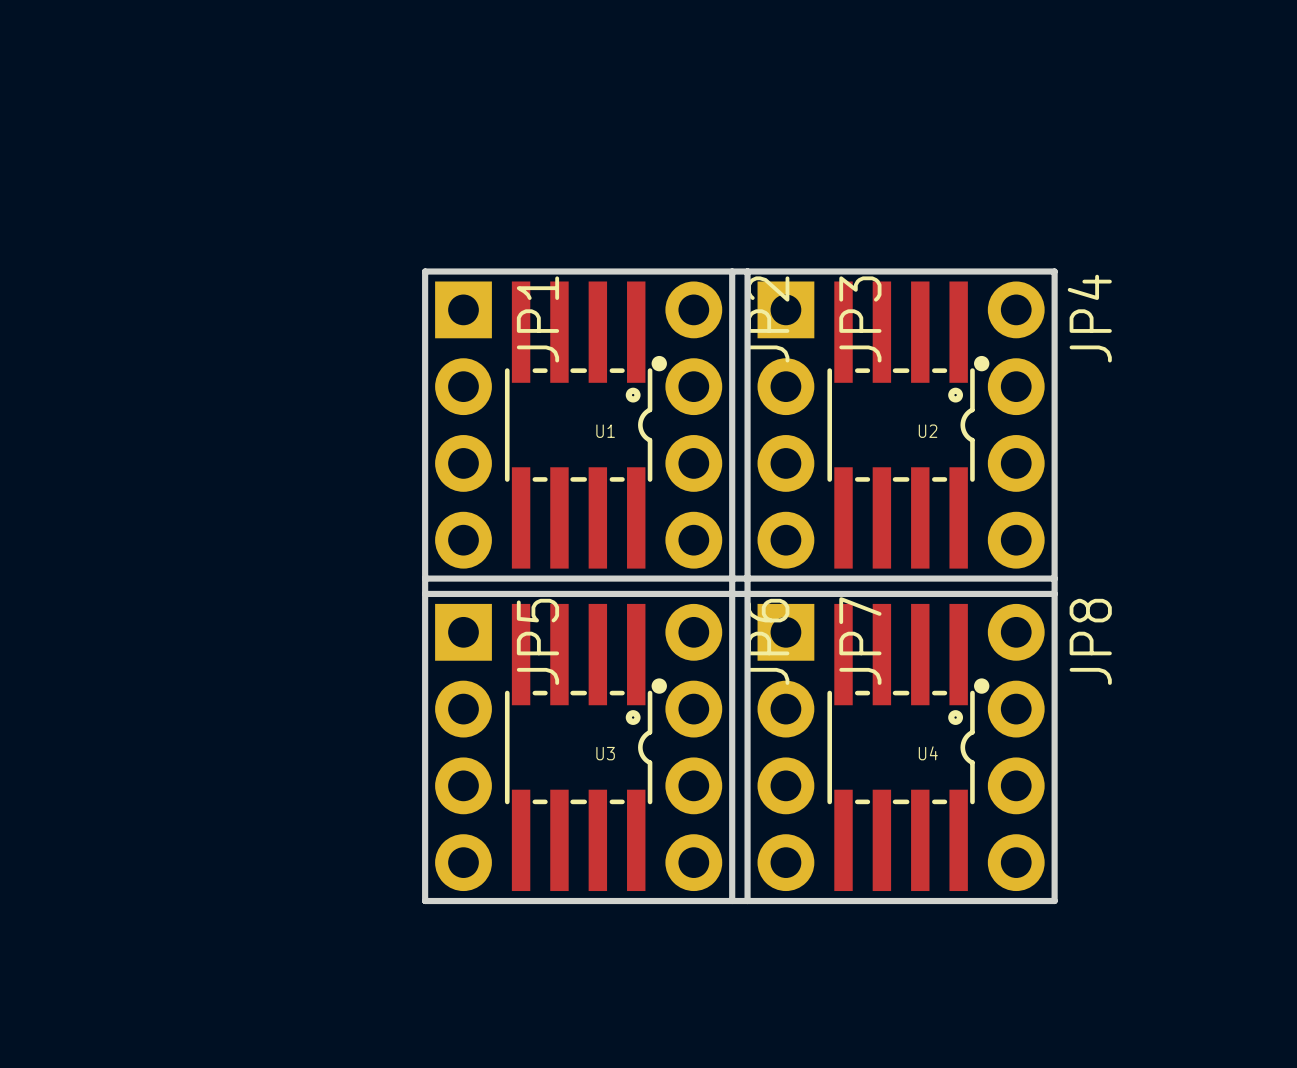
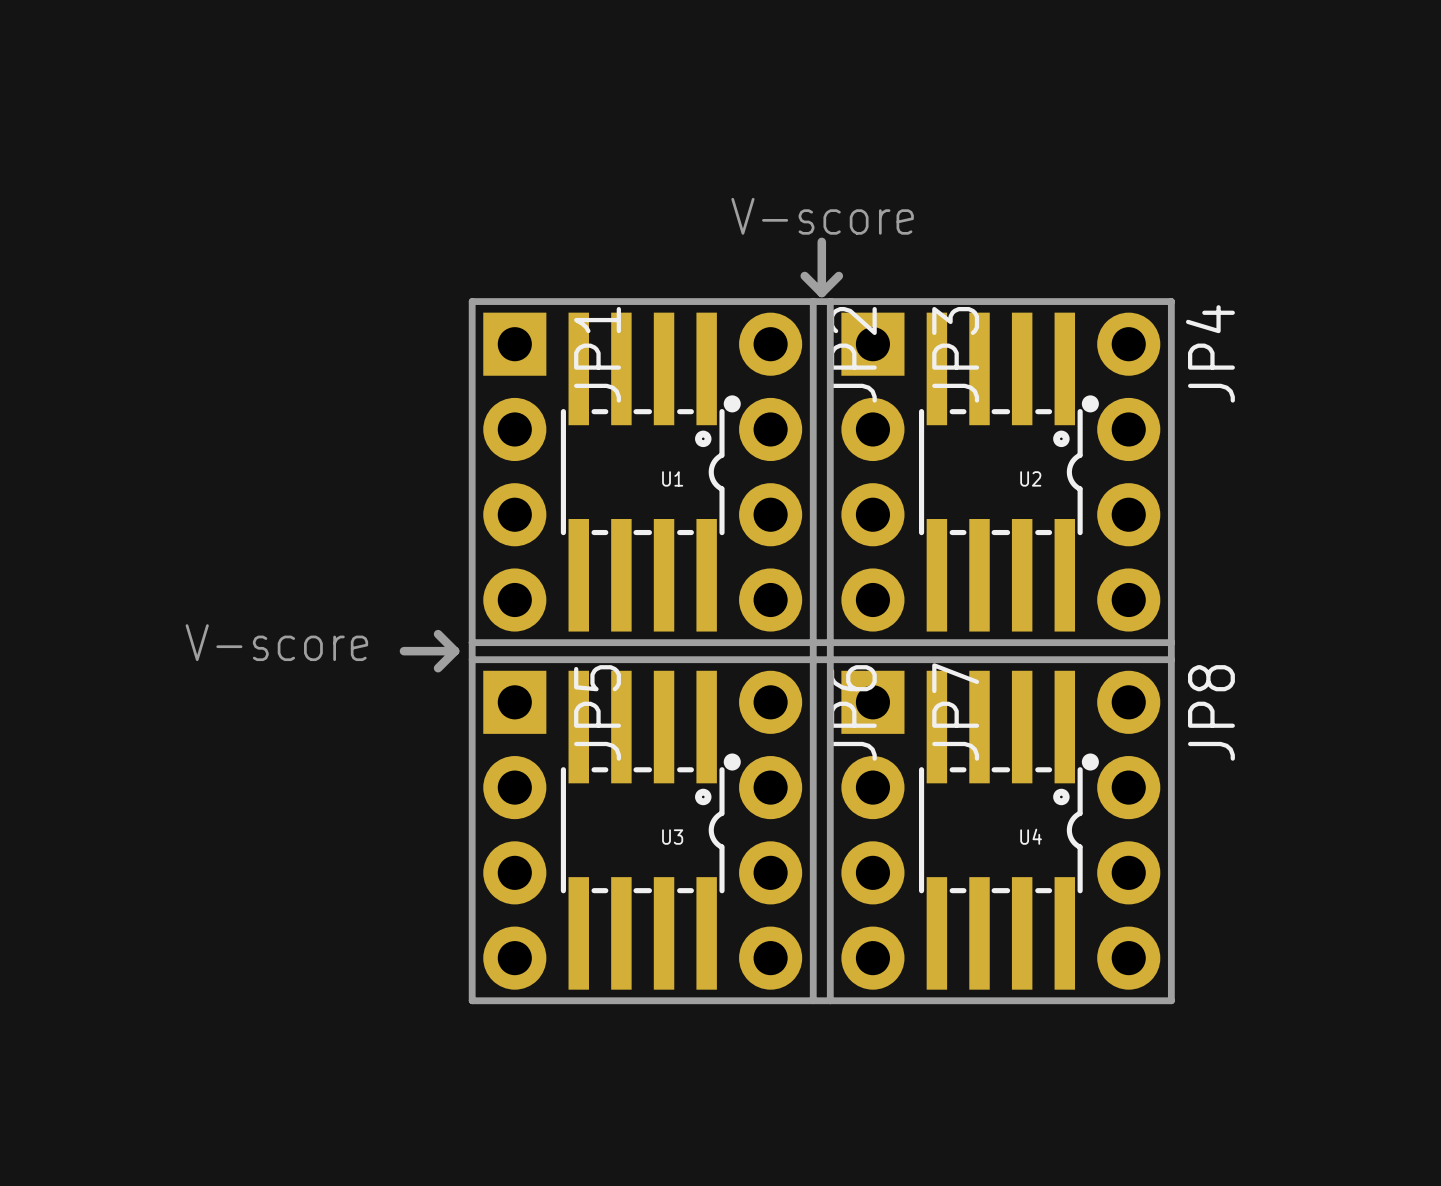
text: none -> V-score (822, 216)
board edge: none -> (821, 241) (821, 284)
board edge: none -> (804, 275) (821, 293) (838, 275)
board edge: none -> (438, 634) (455, 651) (438, 668)
text: none -> V-score (276, 642)
board edge: none -> (403, 651) (446, 651)

